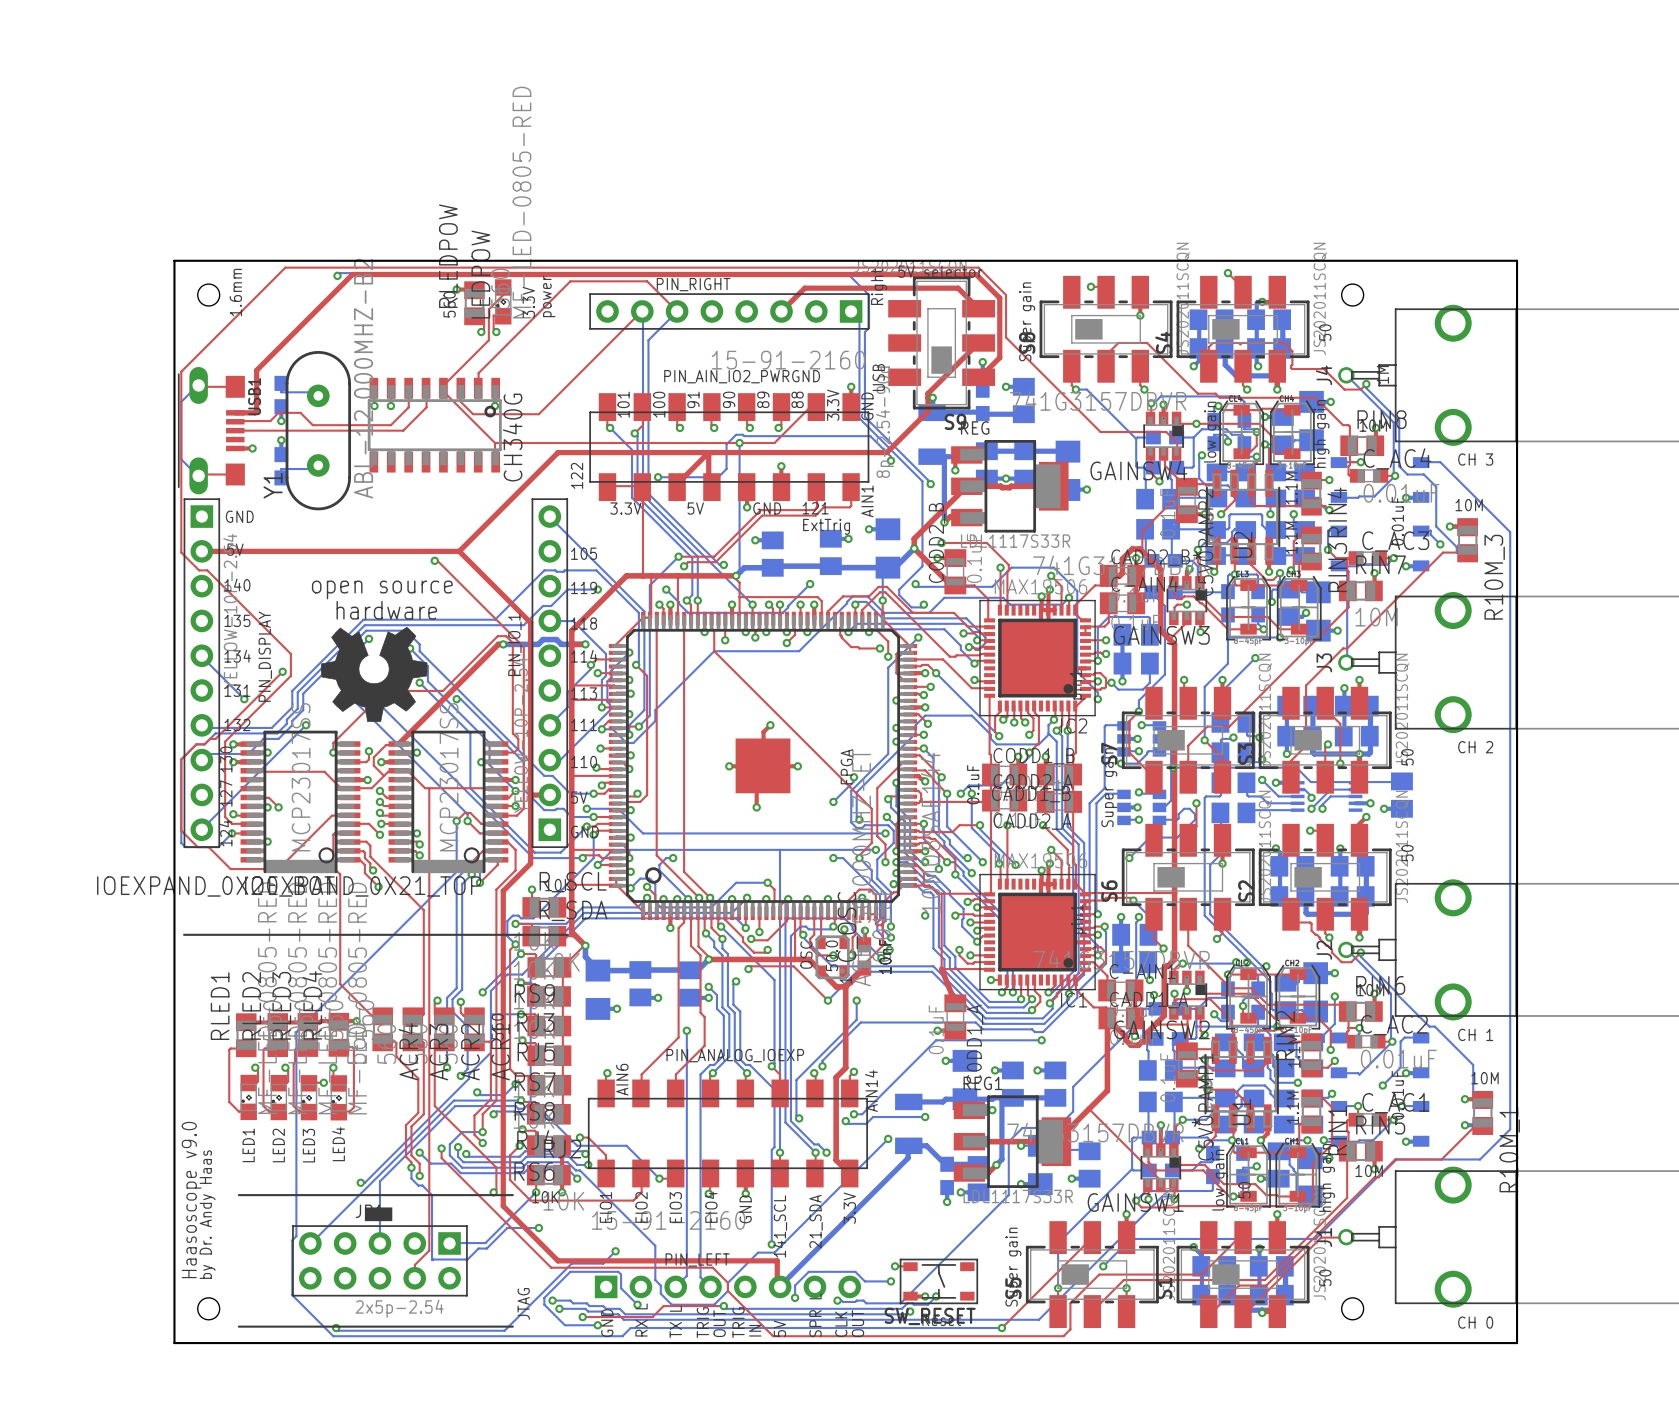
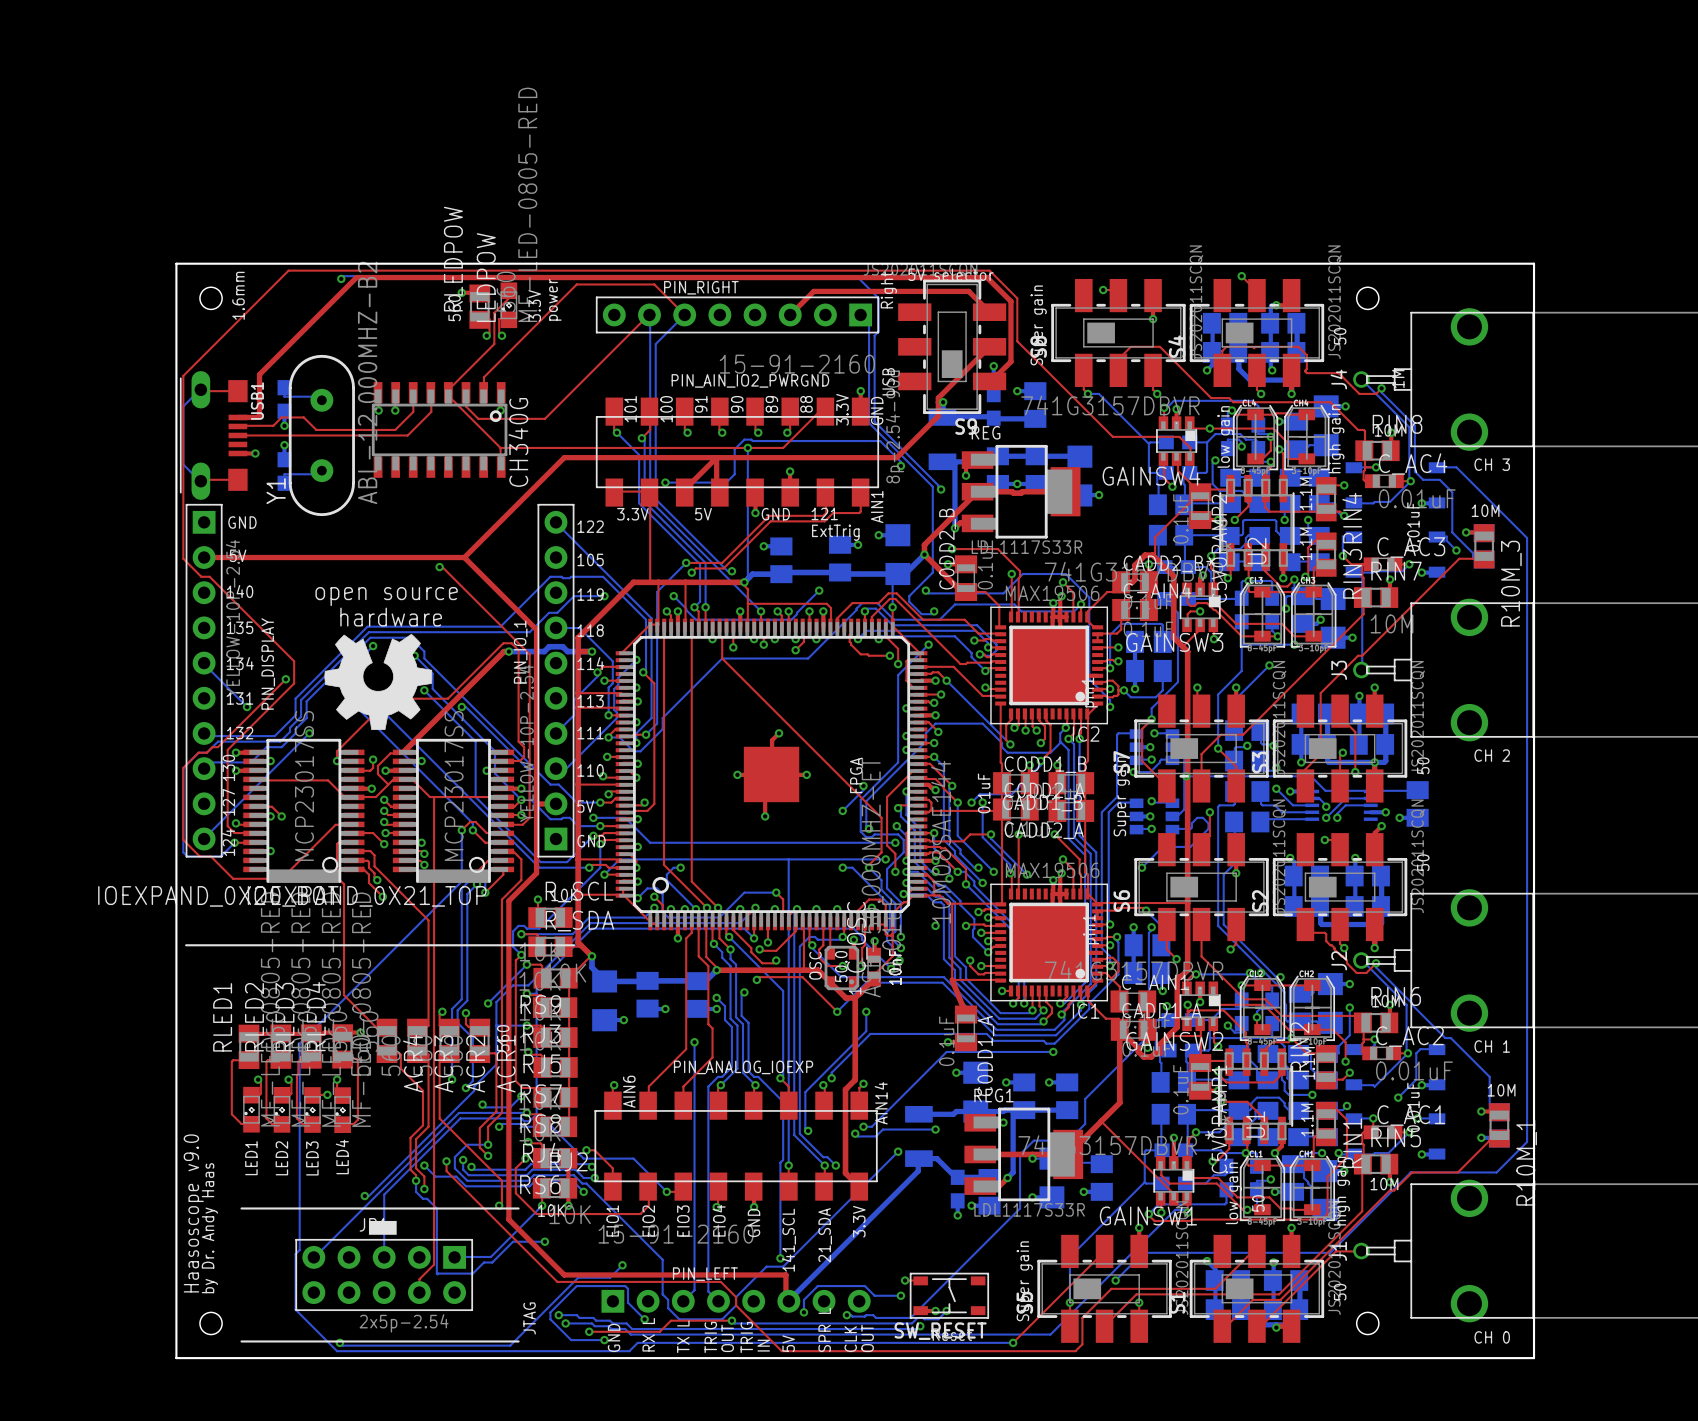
text rotation: 0° (577, 475) -> 90° clockwise (590, 526)
text position: 122 (577, 475) -> 122 (590, 526)

